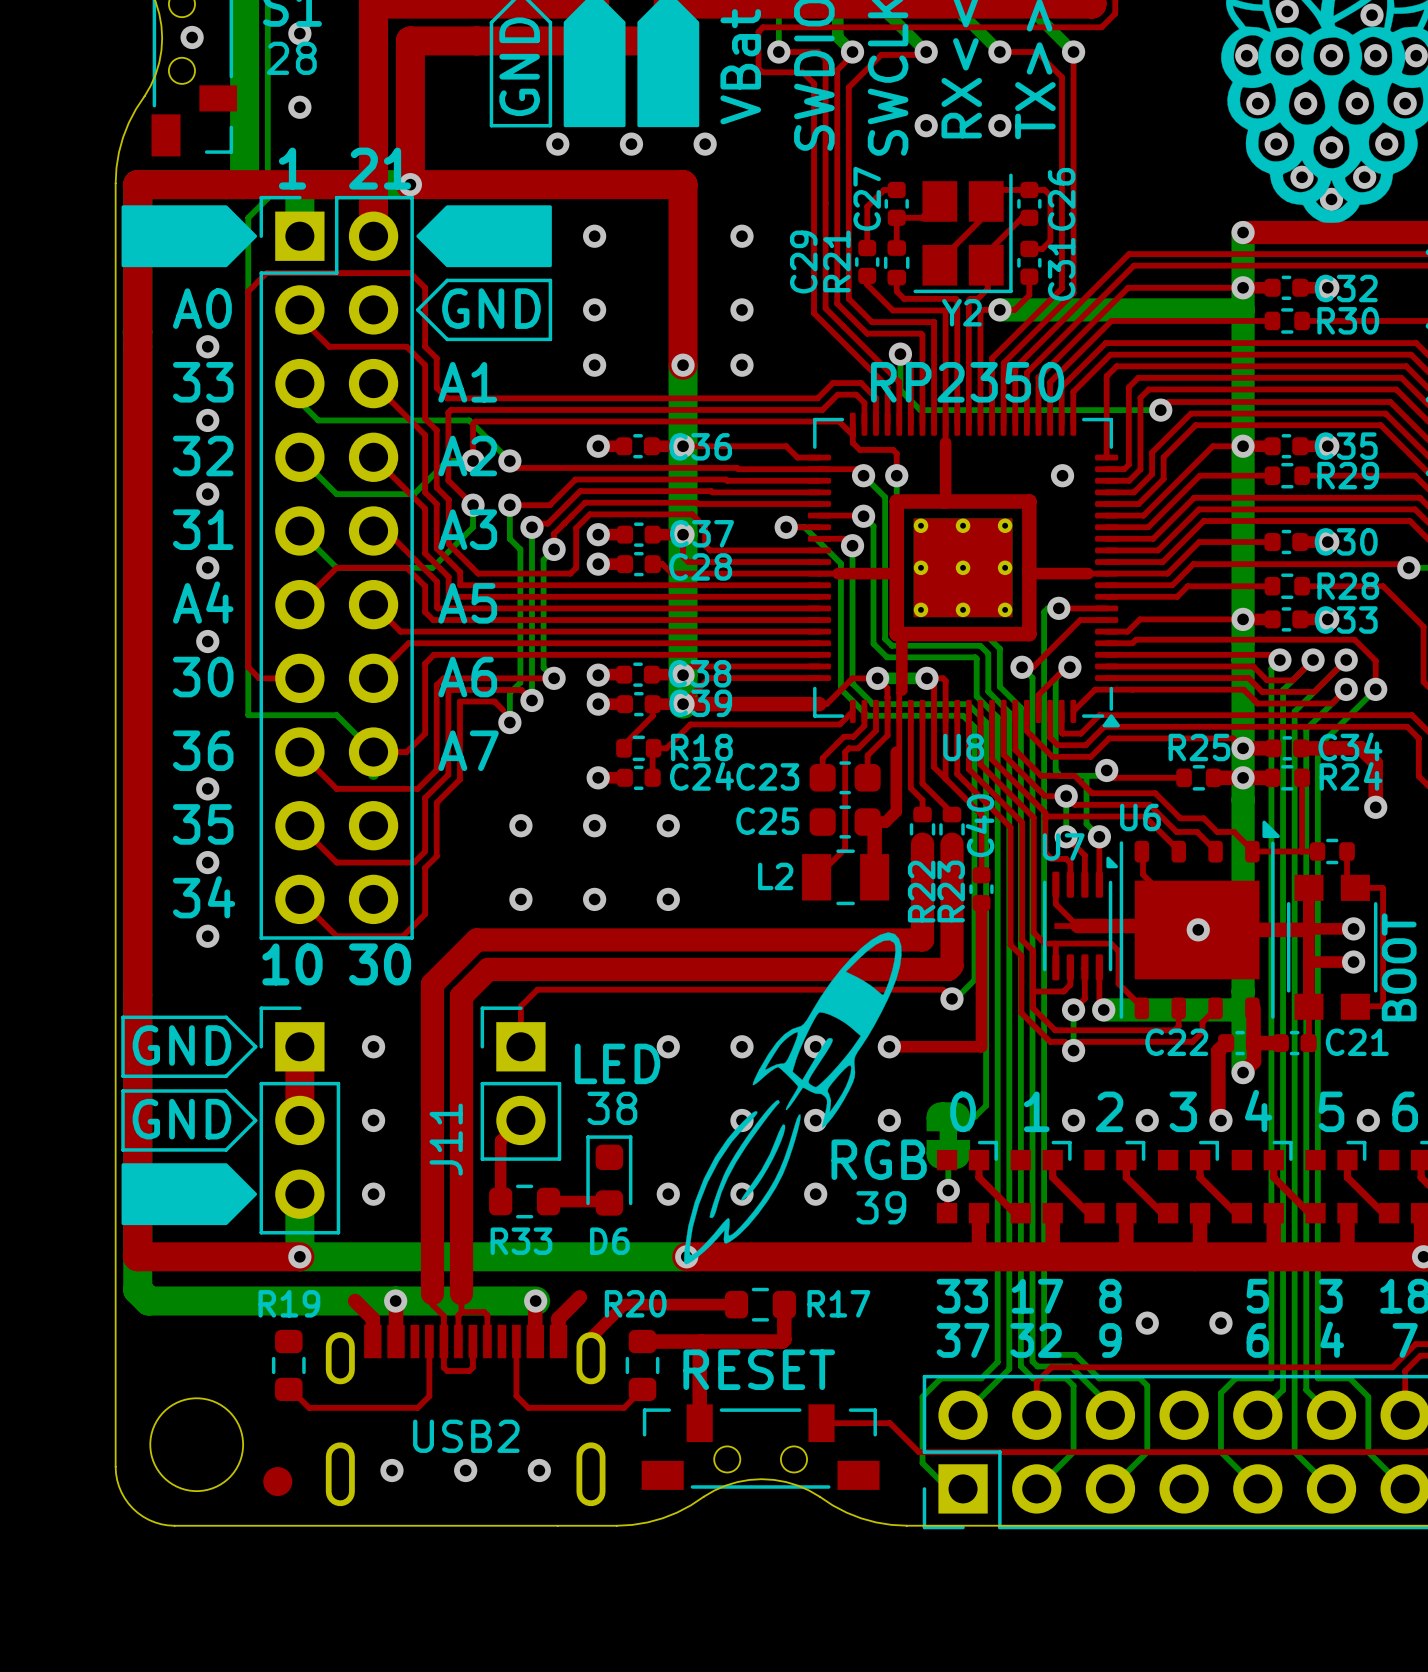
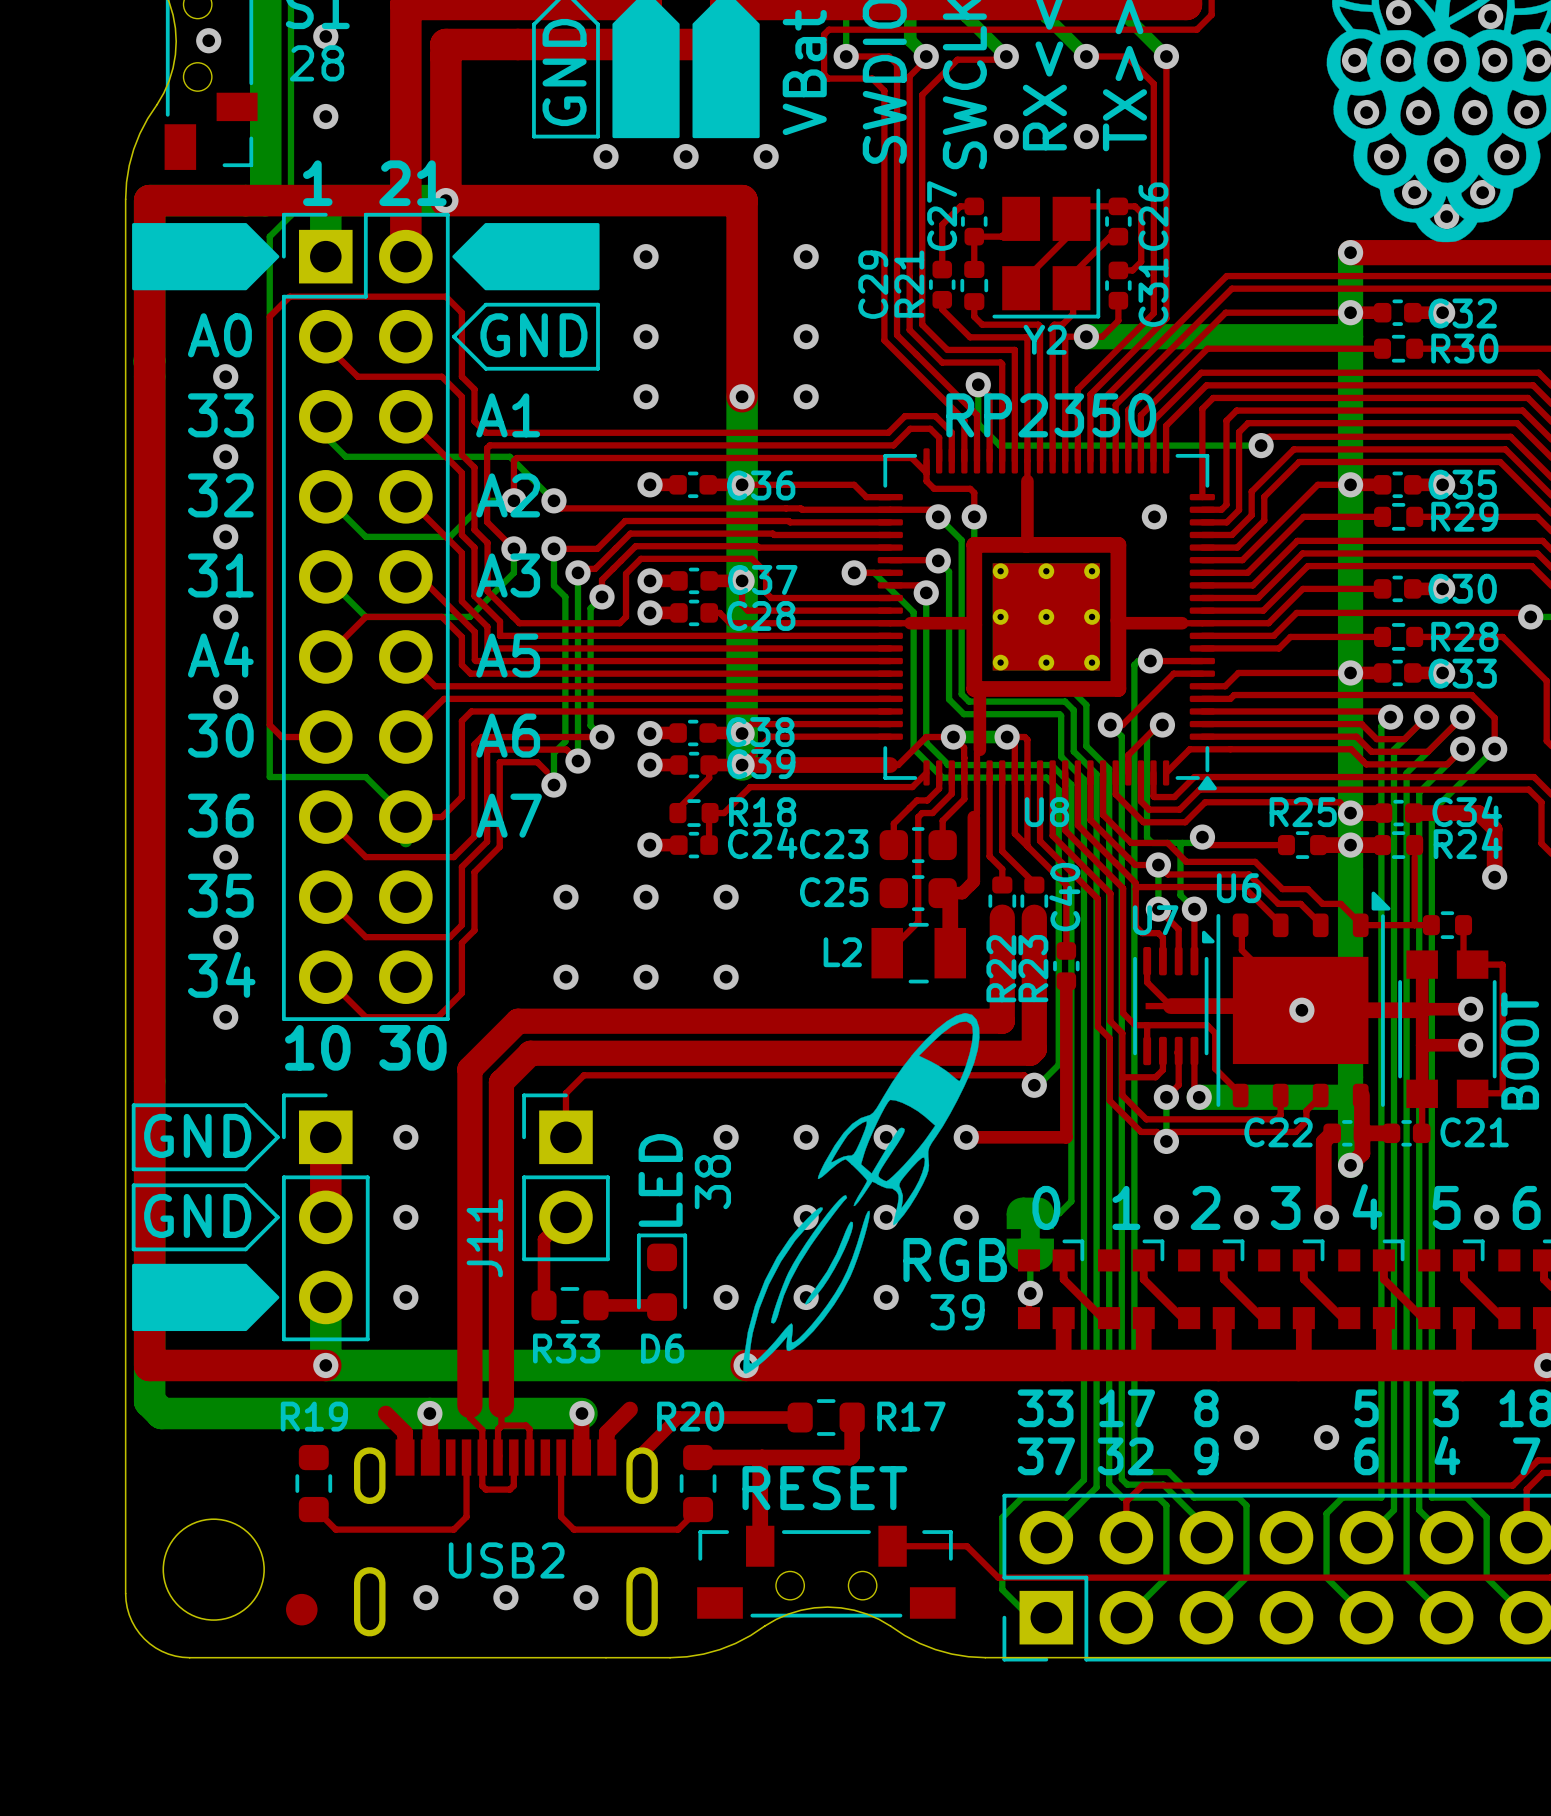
text rotation: 0° (617, 1063) -> 90° counterclockwise (660, 1180)
text rotation: 0° (612, 1108) -> 90° counterclockwise (712, 1182)

